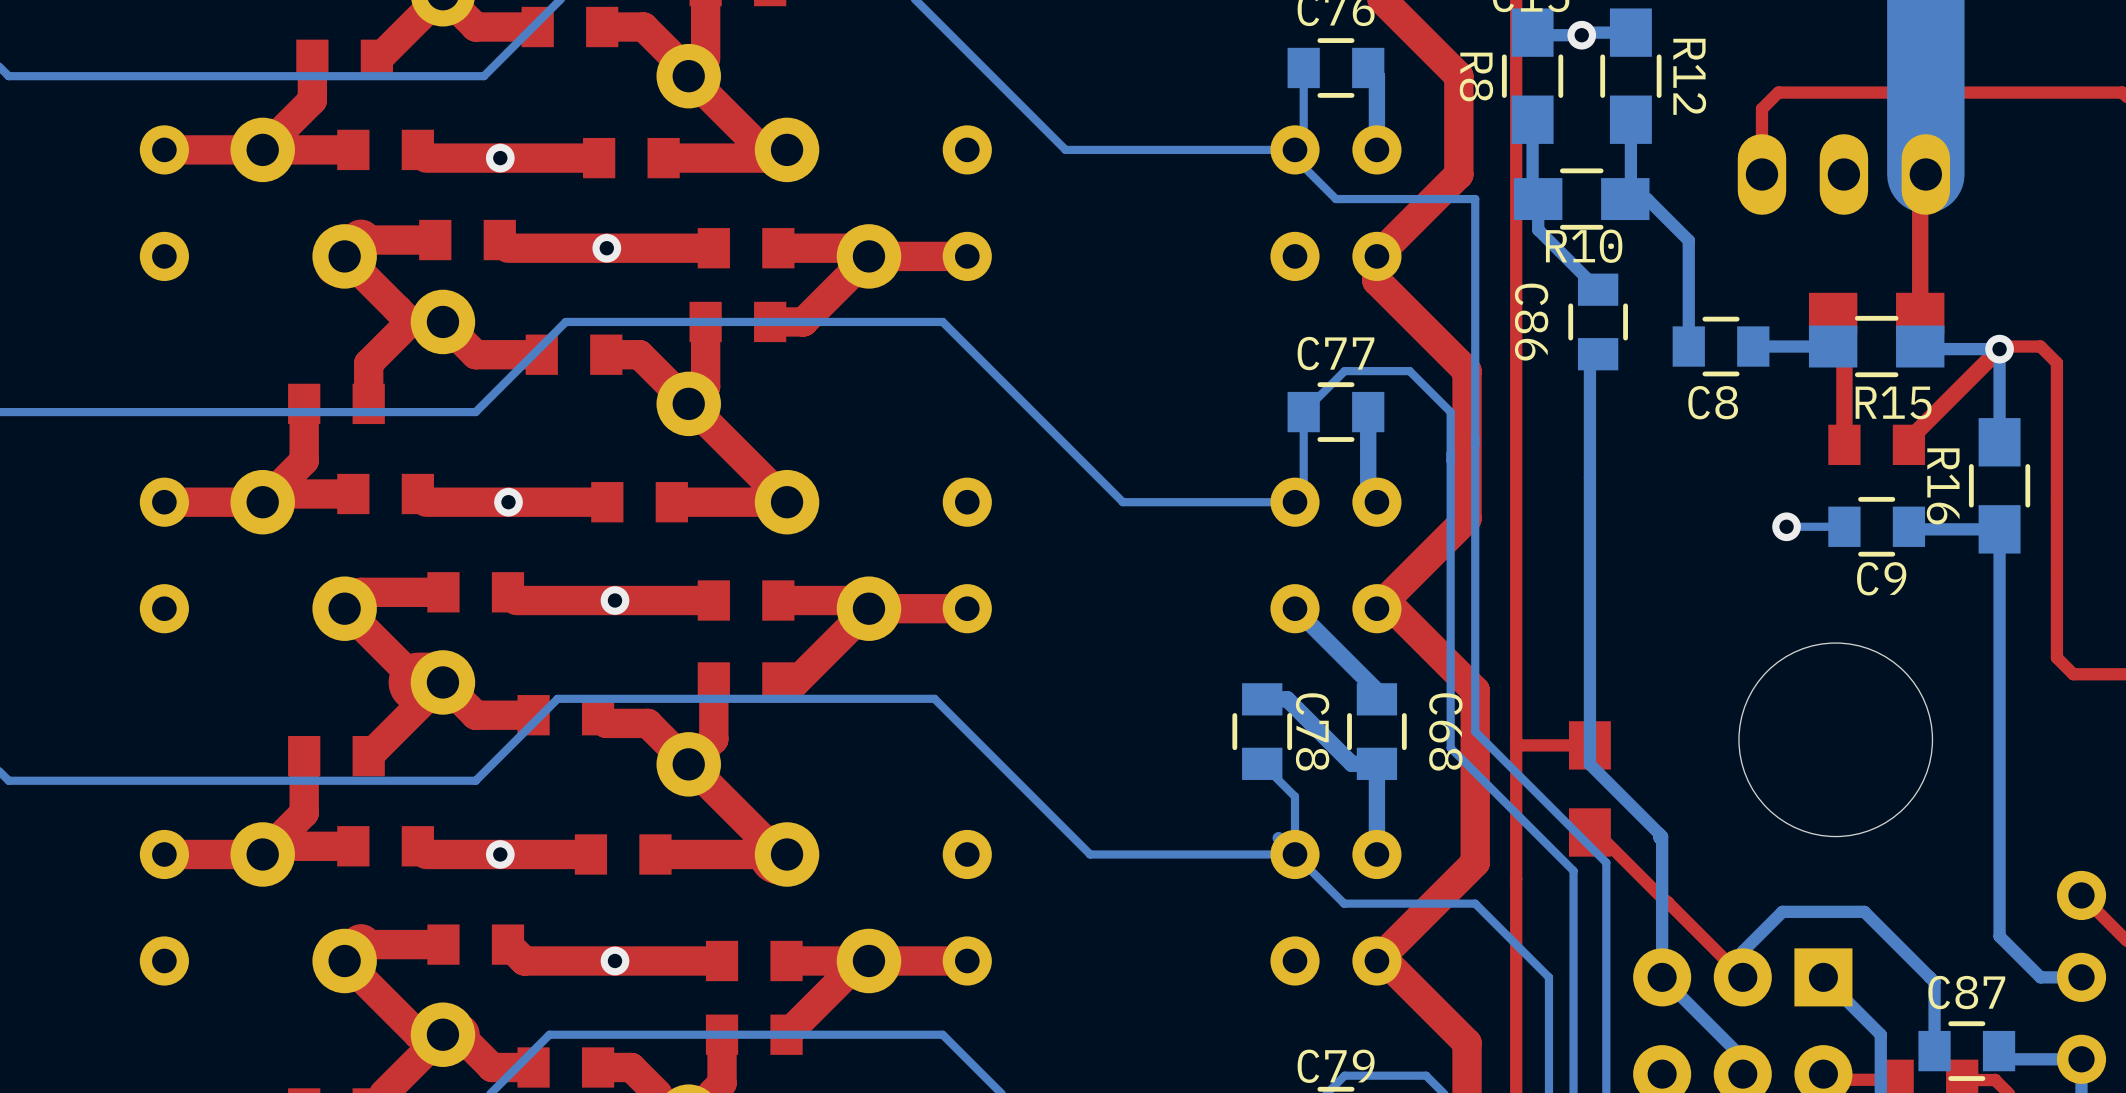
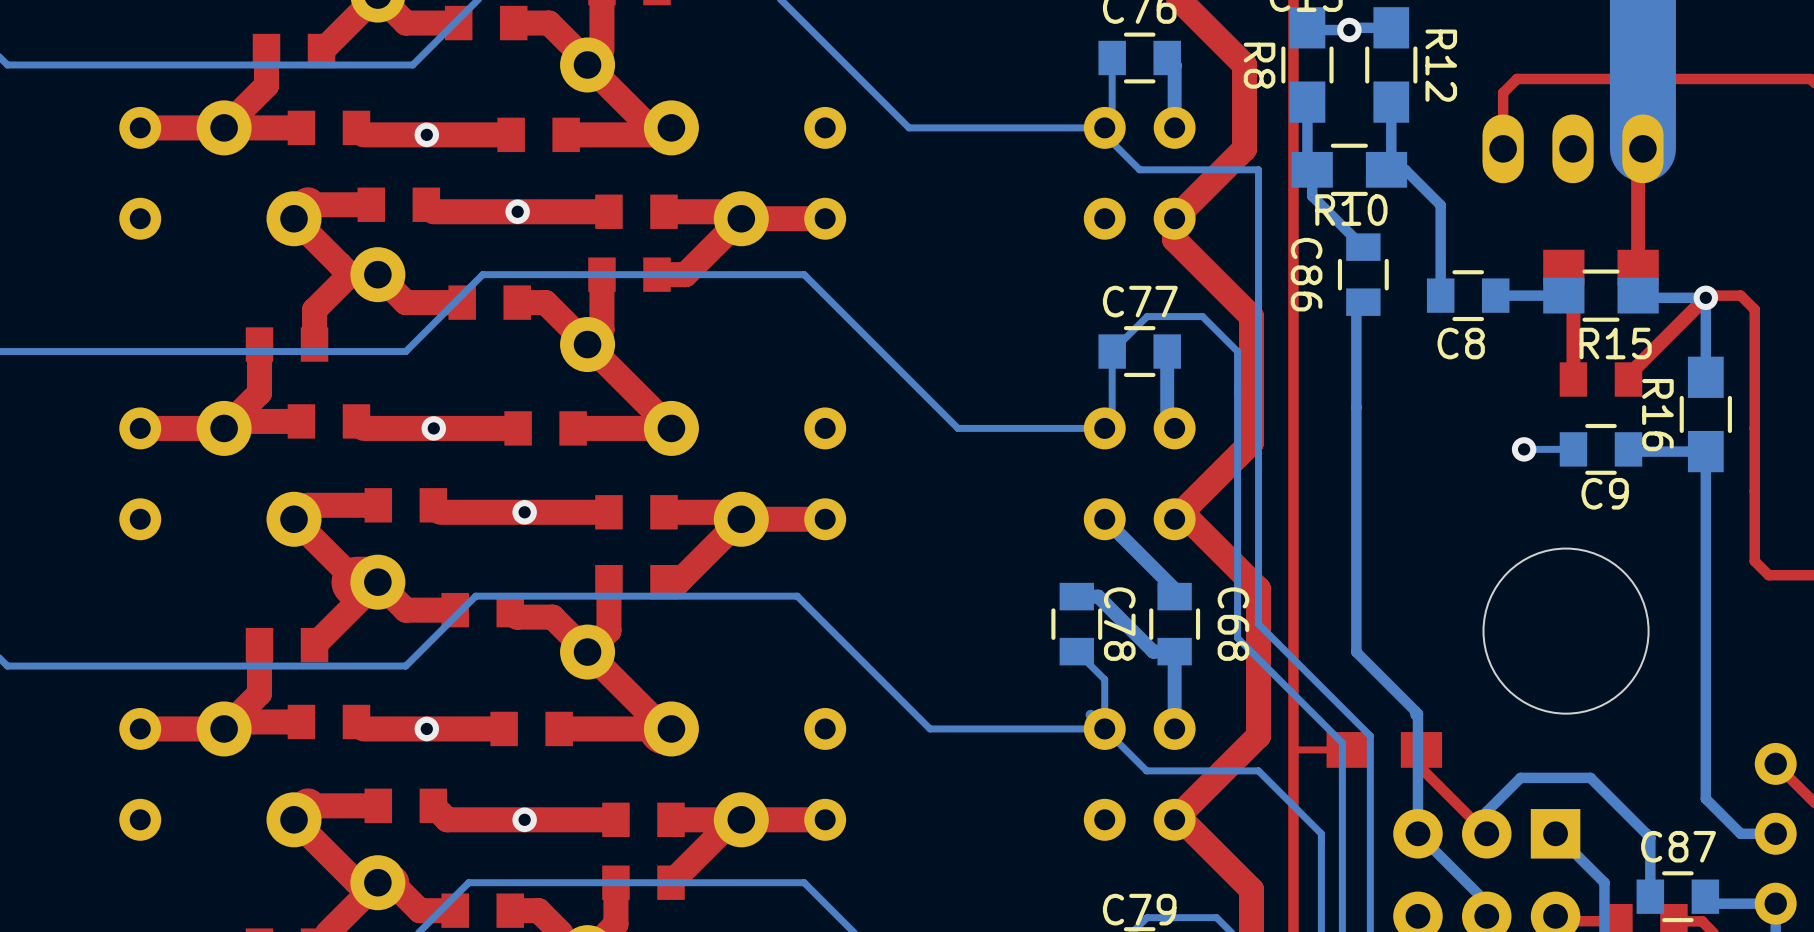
top track: (1589, 745) (1516, 745) -> none
part rotation: 0° (1589, 788) -> 90° clockwise (1384, 749)
part position: (1589, 788) -> (1384, 749)
top track: (1589, 832) (1596, 832) (1668, 902) -> none
top track: none -> (1347, 749) (1293, 749)

